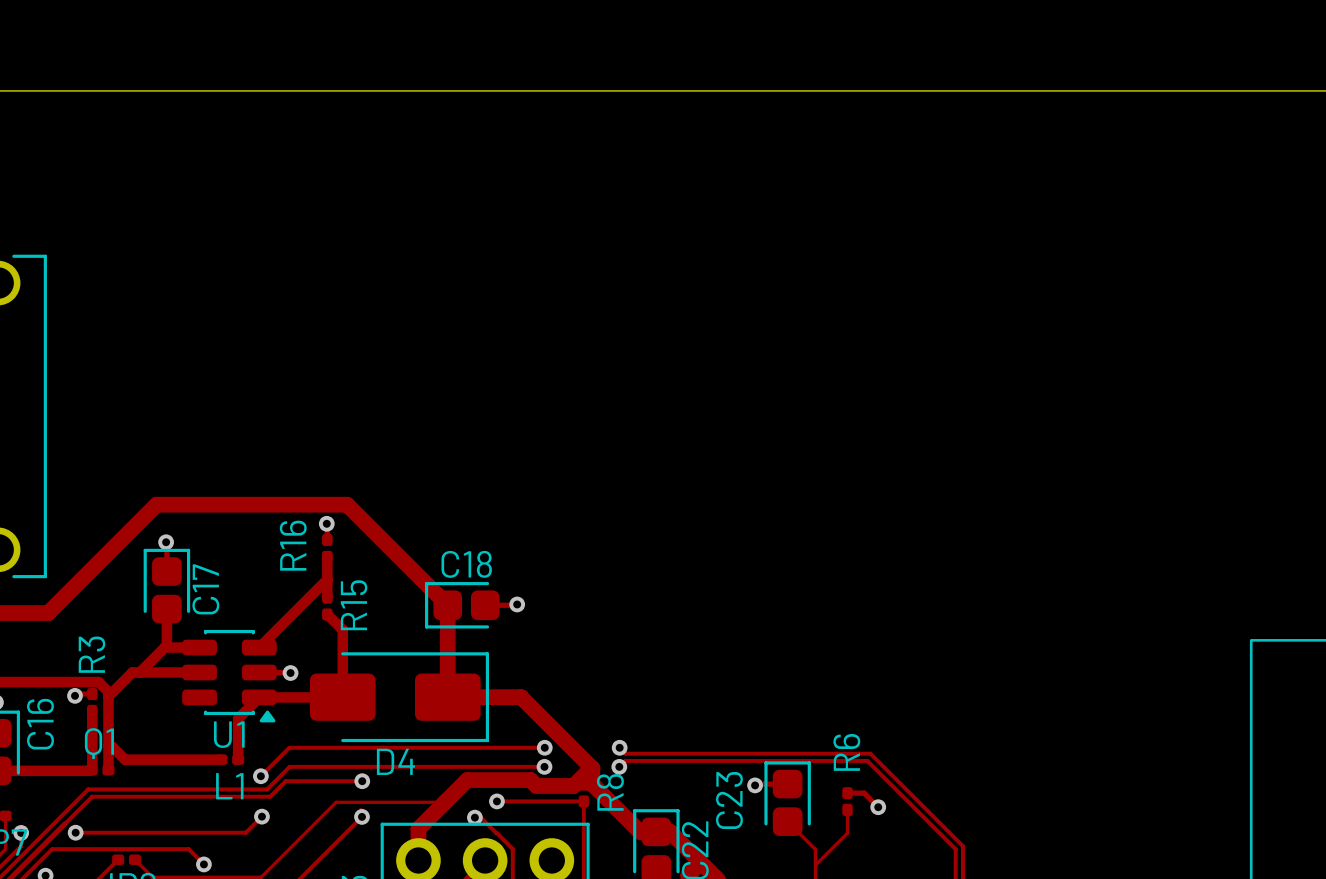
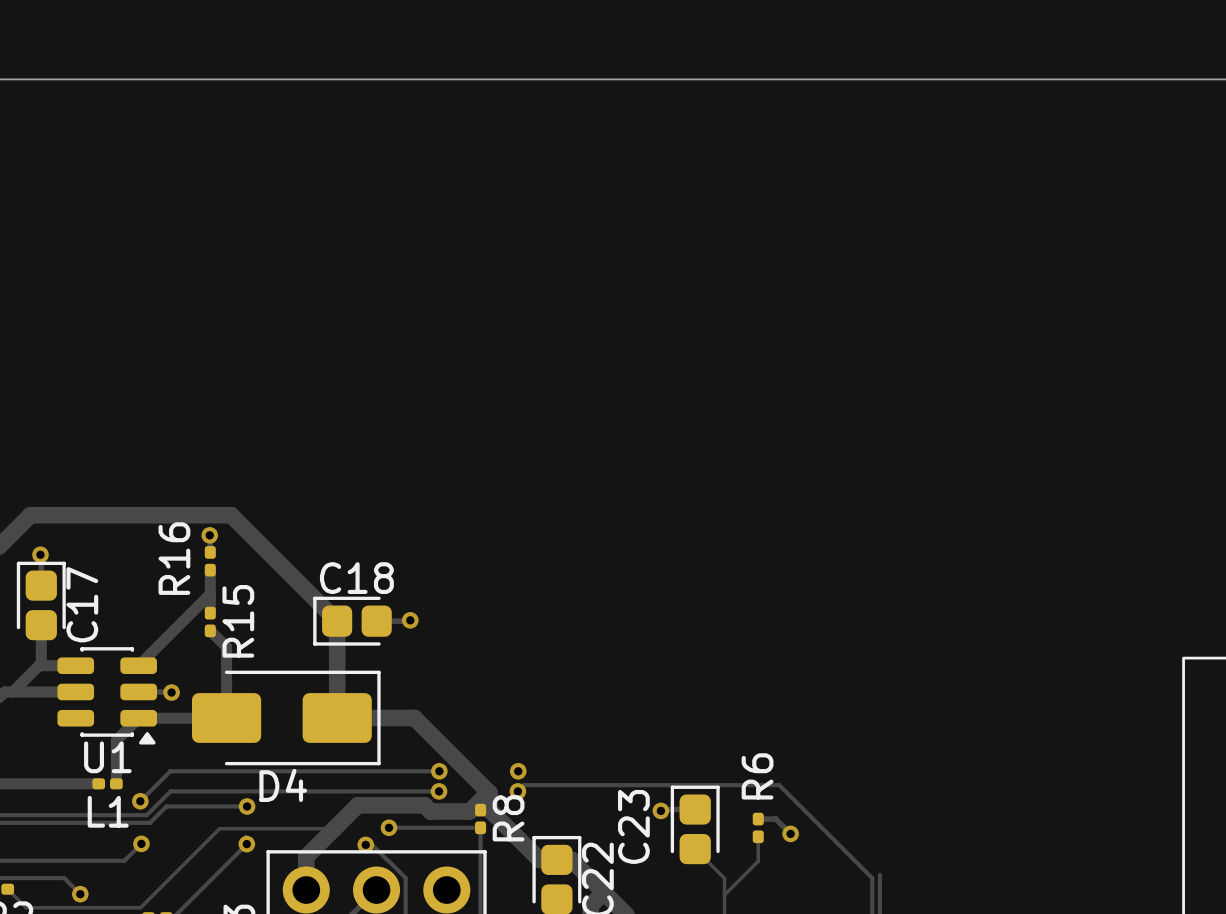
track: (619, 747) (625, 753) (870, 753) (962, 846) -> none

